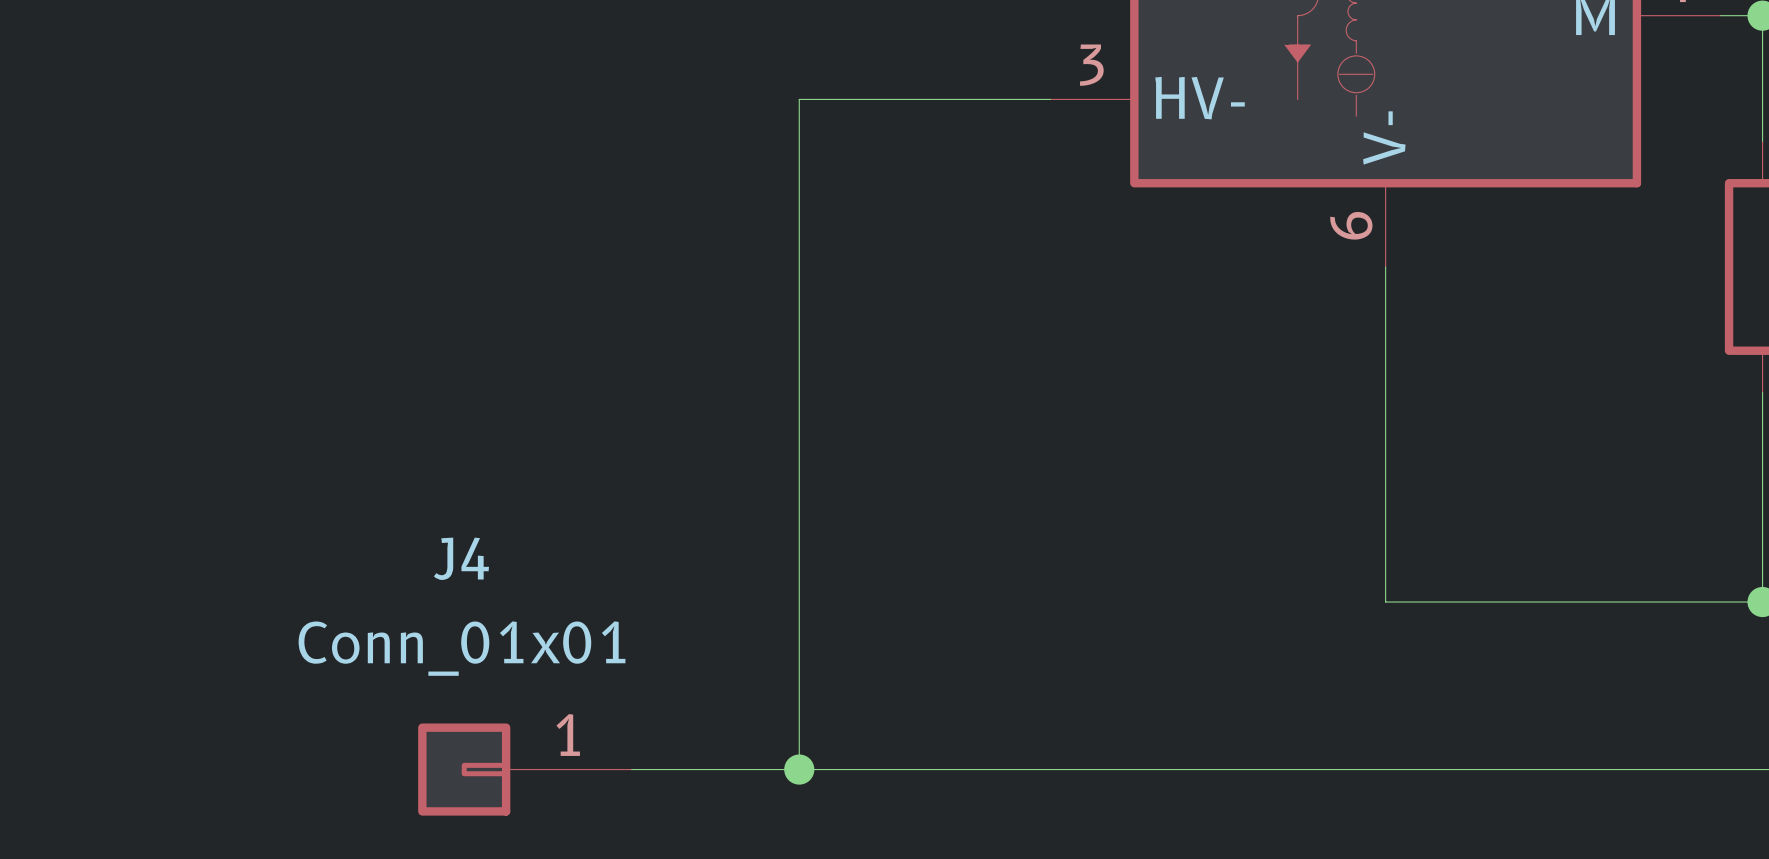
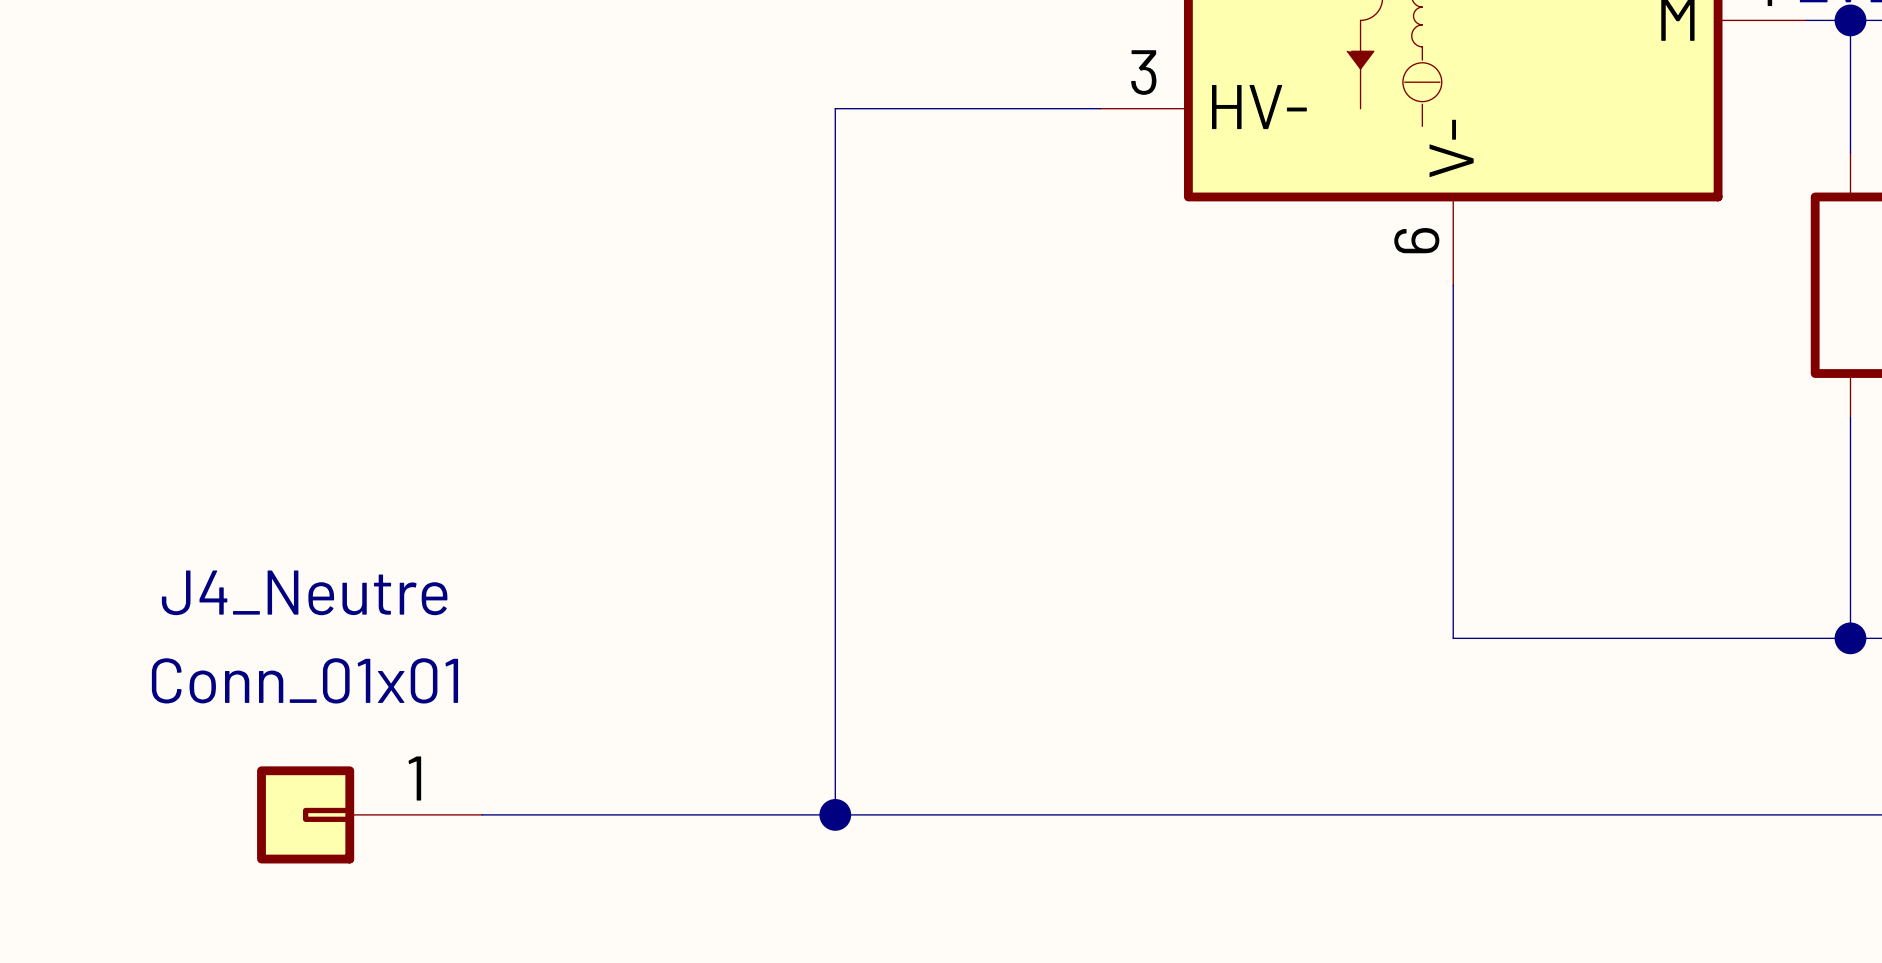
J4_Neutre: none -> Conn_01x01 (369, 814)
J4: Conn_01x01 (524, 769) -> none

